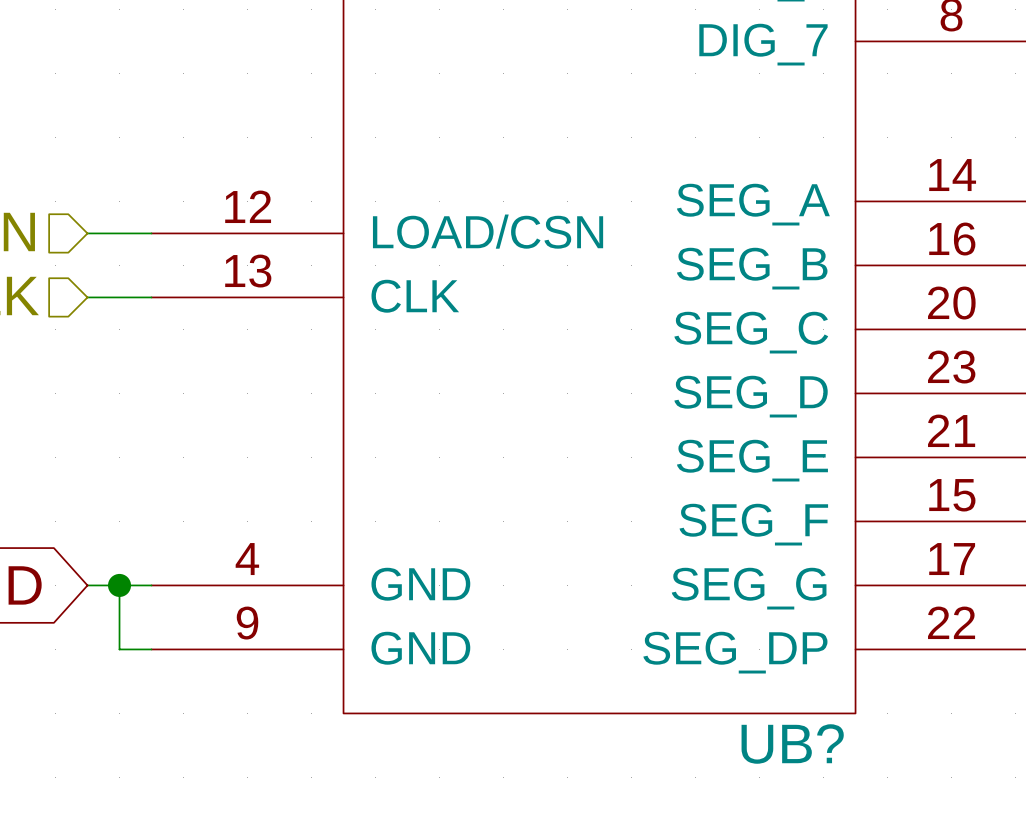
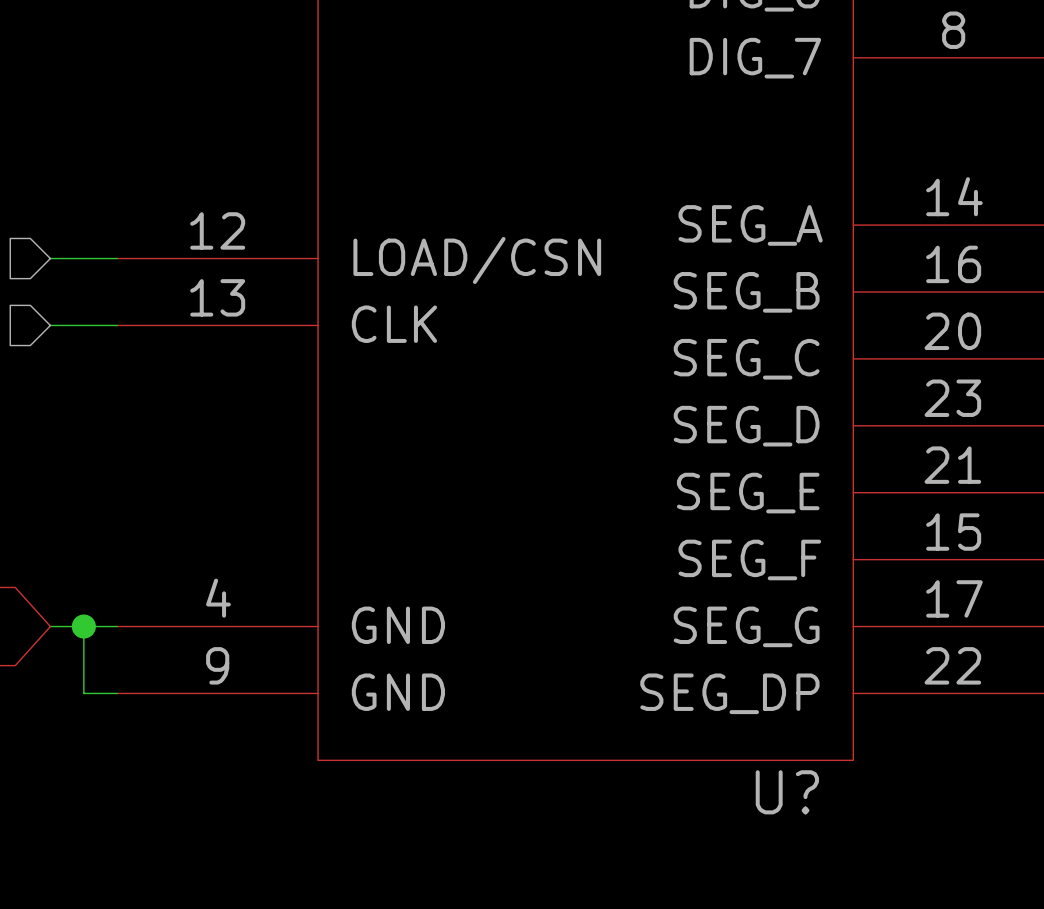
UB? name: UB? (792, 744) -> U? (787, 792)

